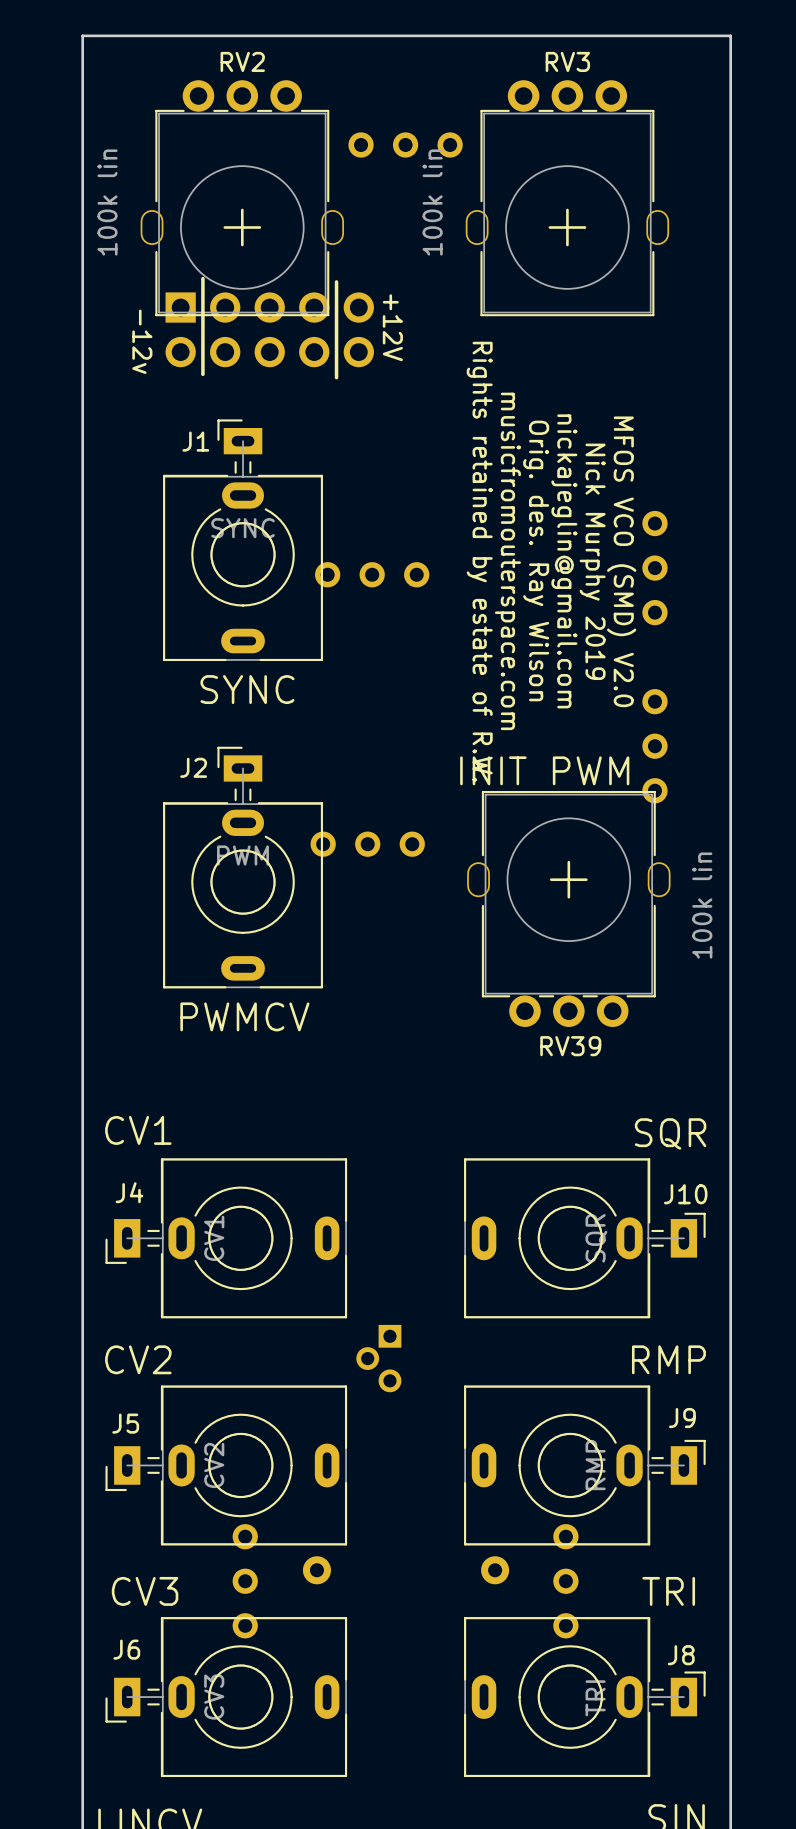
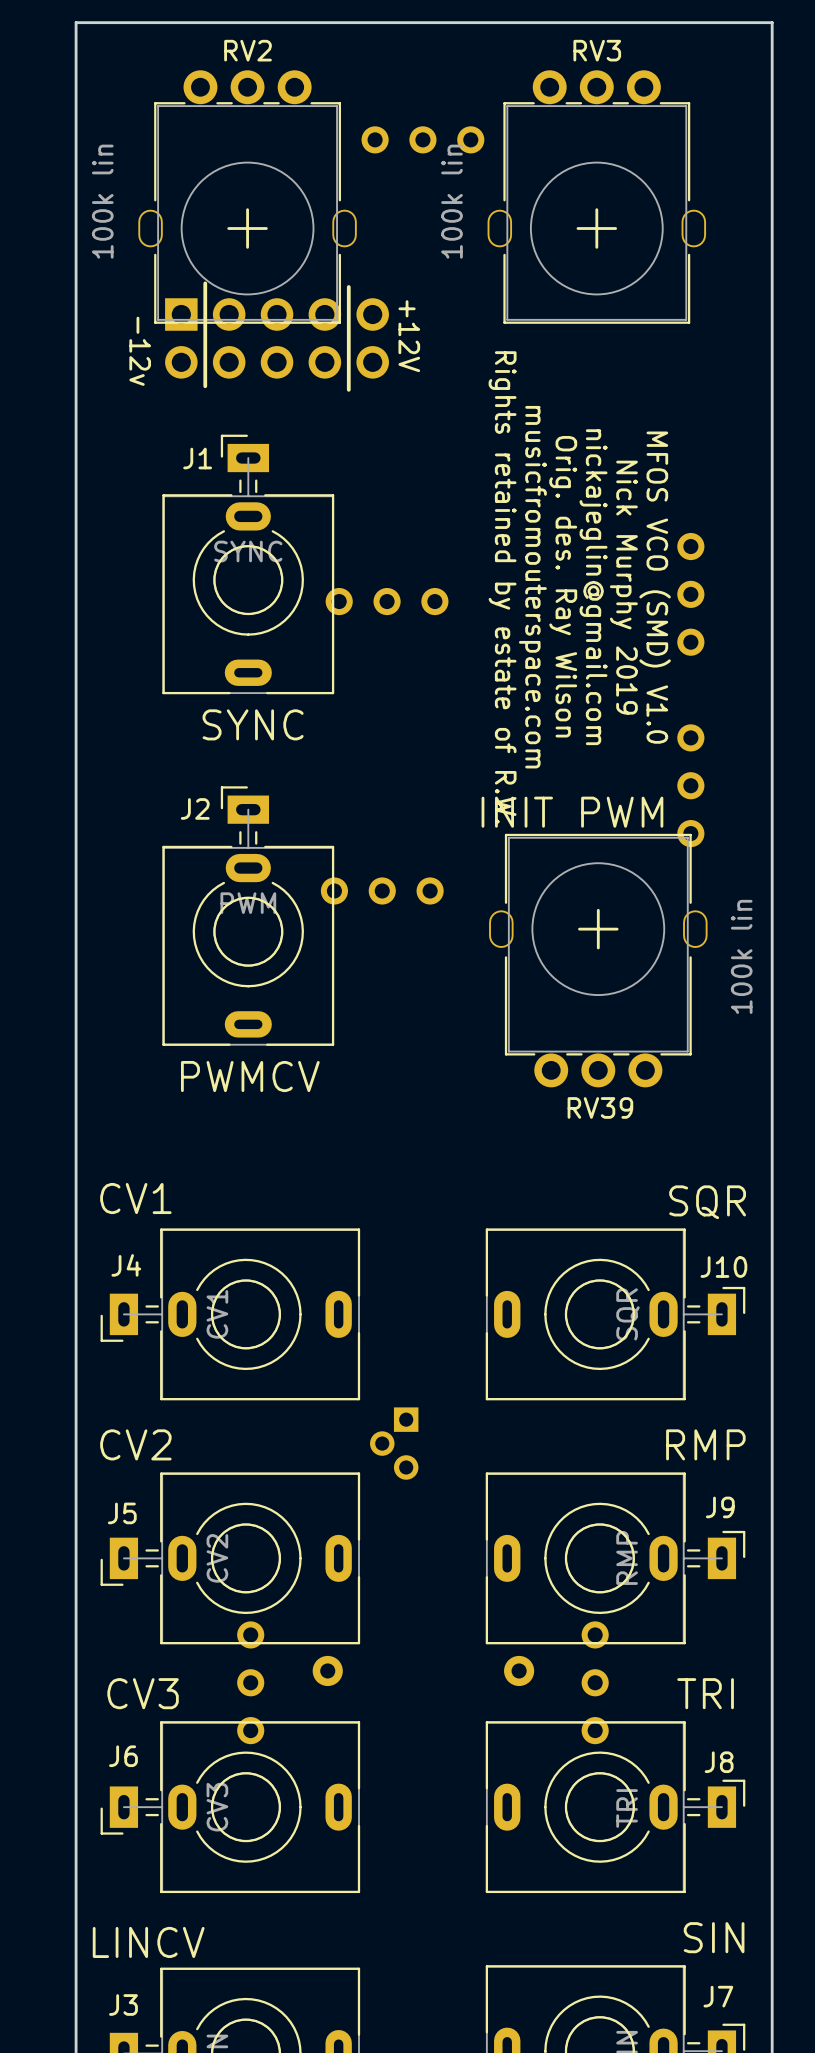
text: MFOS VCO (SMD) V2.0 (621, 561) -> MFOS VCO (SMD) V1.0 (655, 587)

